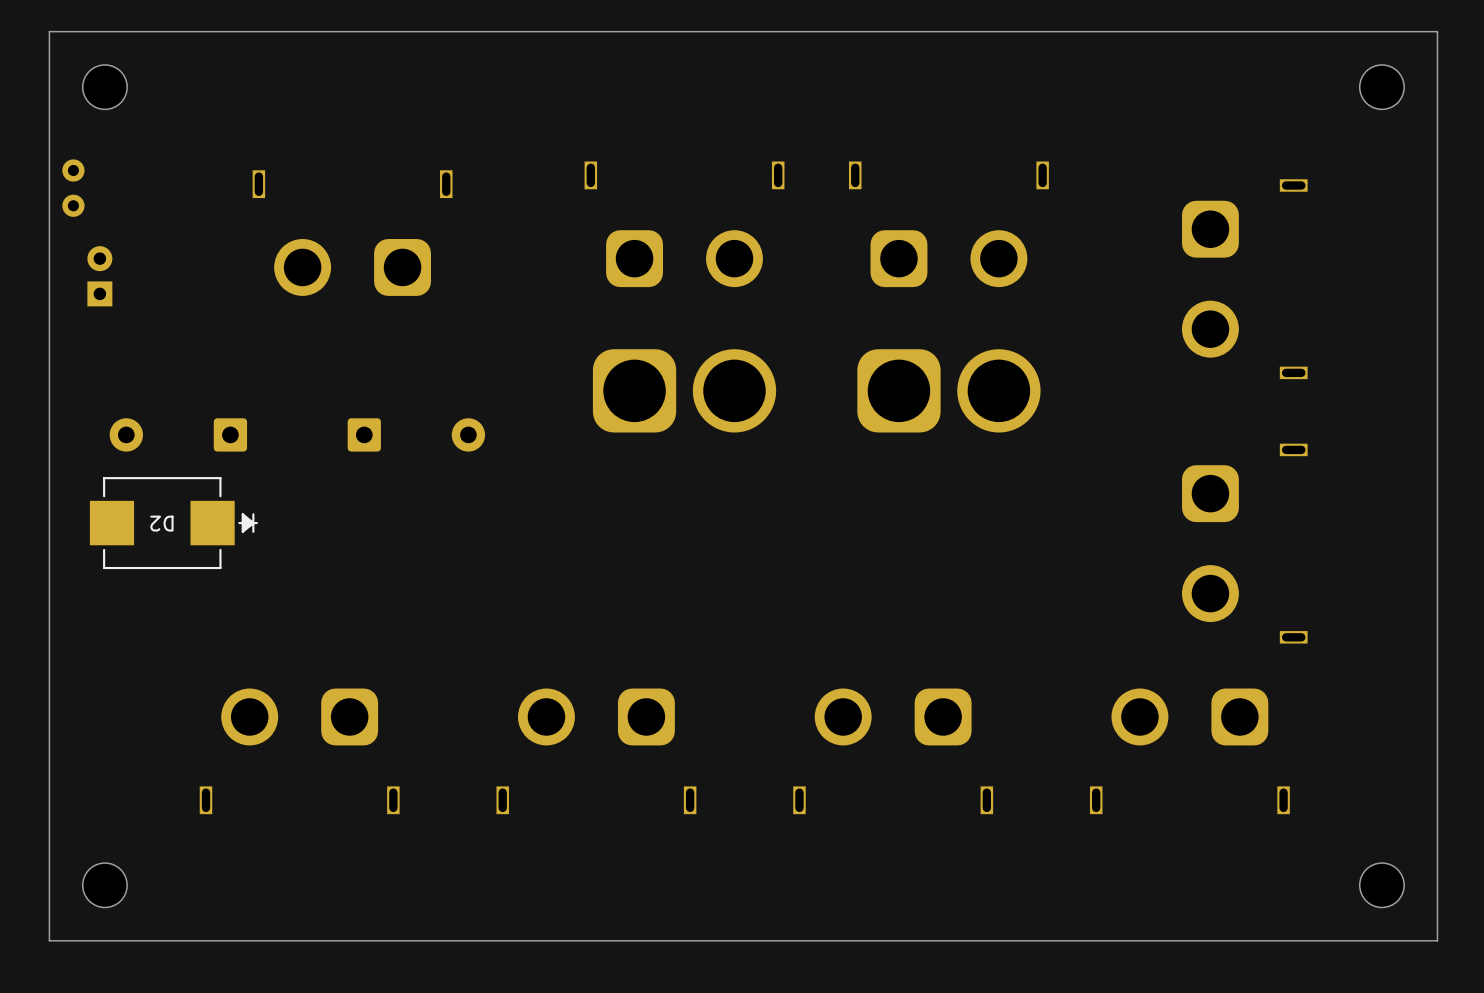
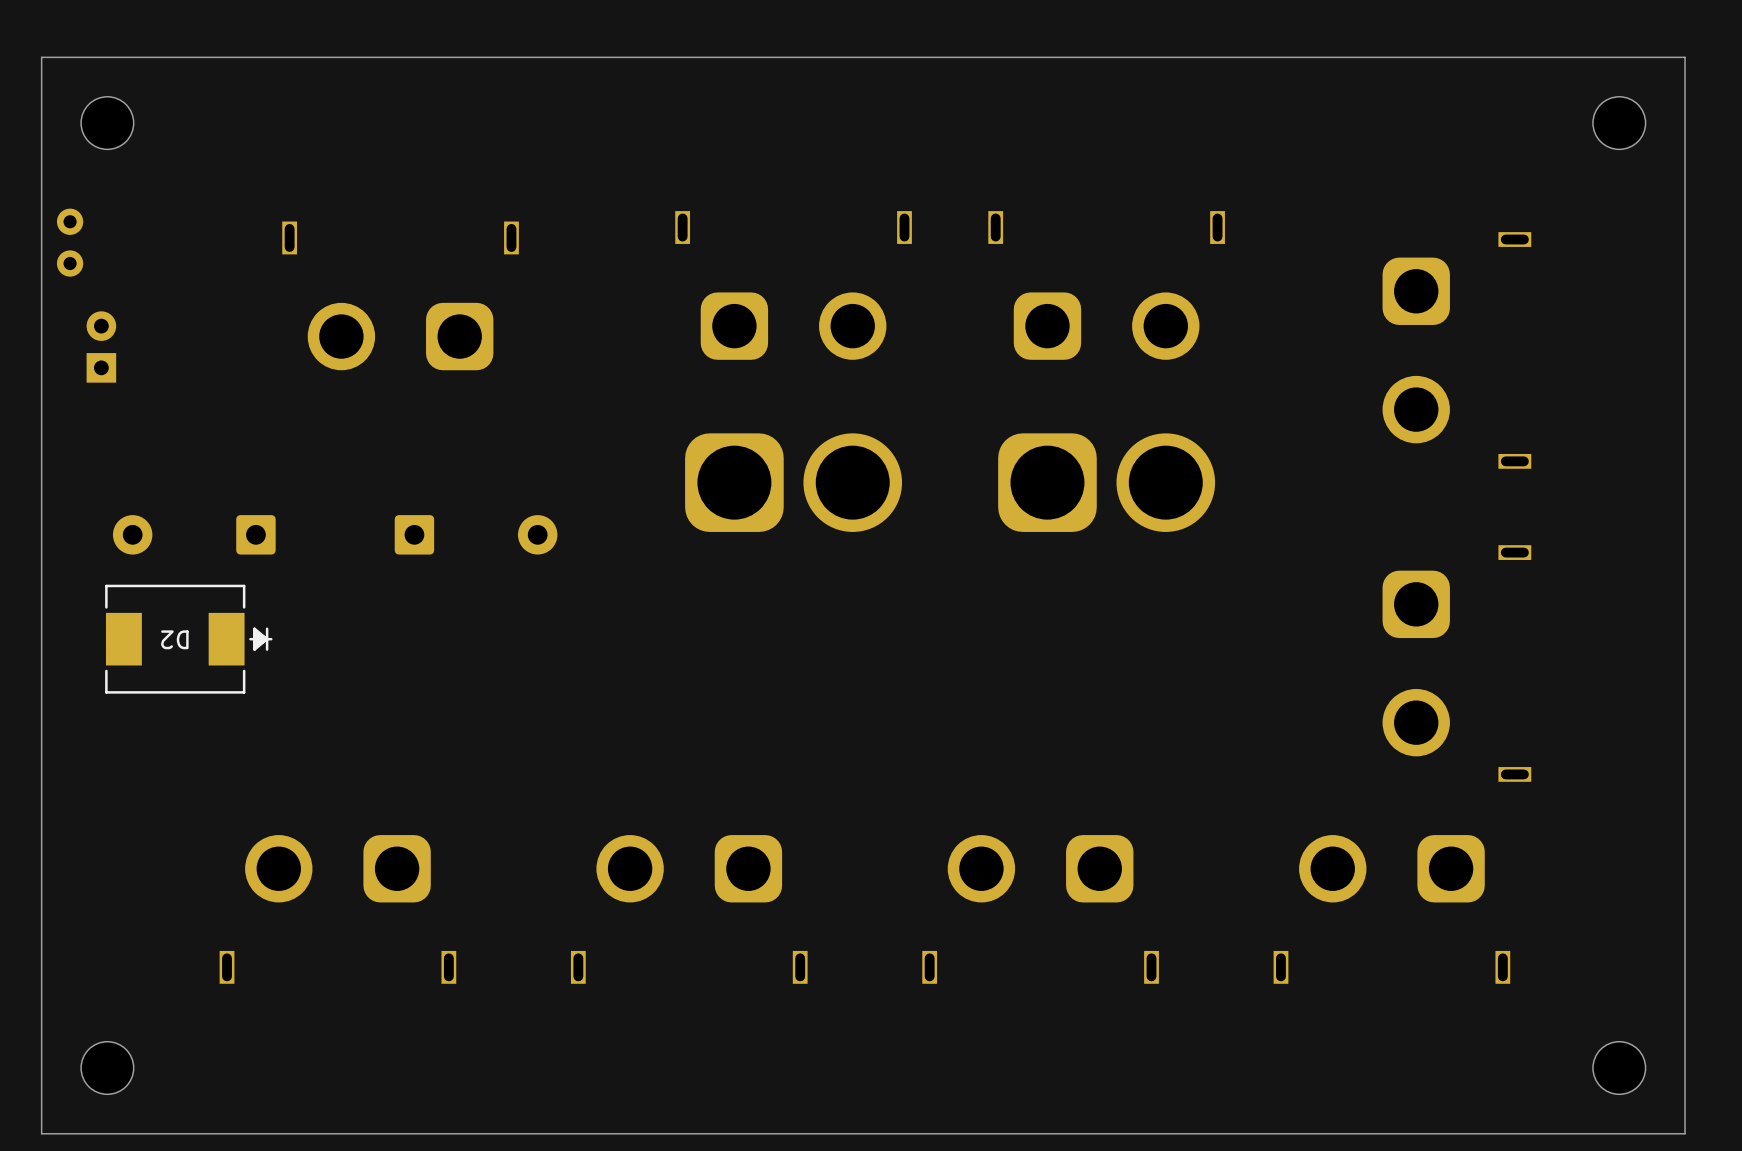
D2 footprint: [89, 477, 258, 570] -> [105, 584, 273, 694]

